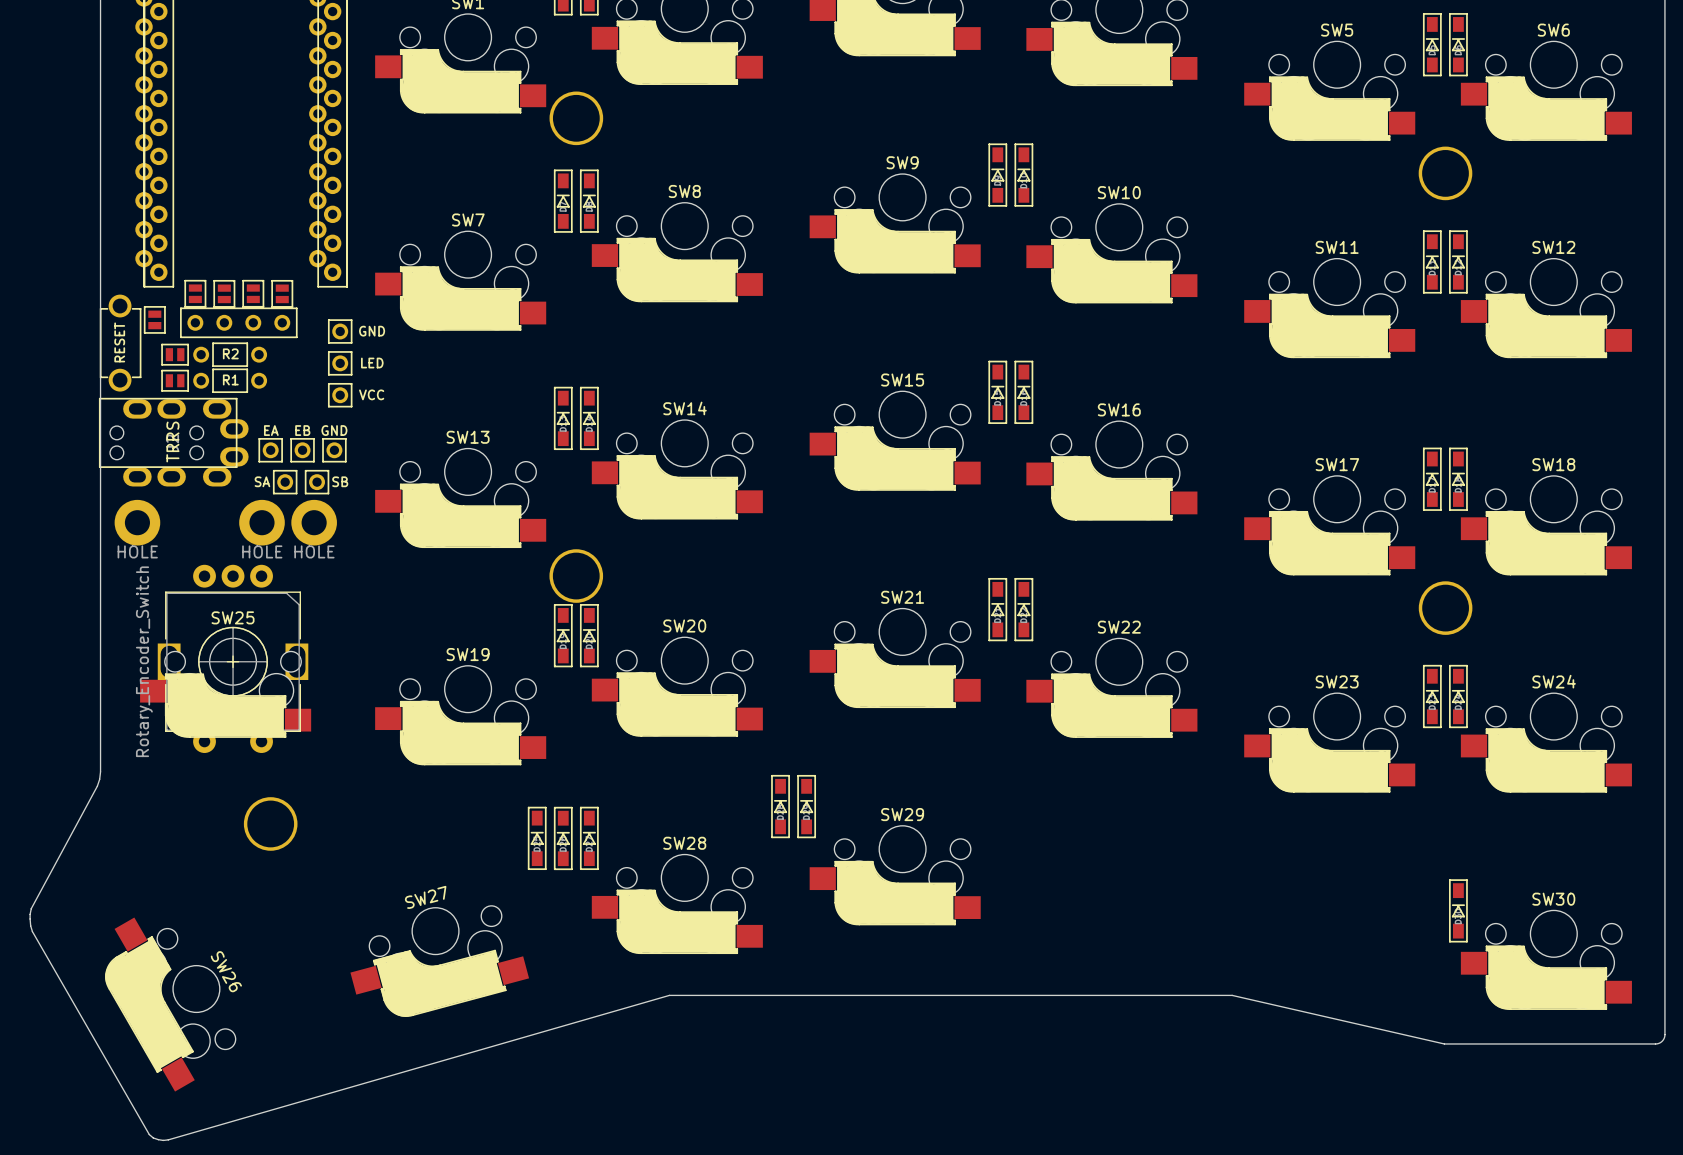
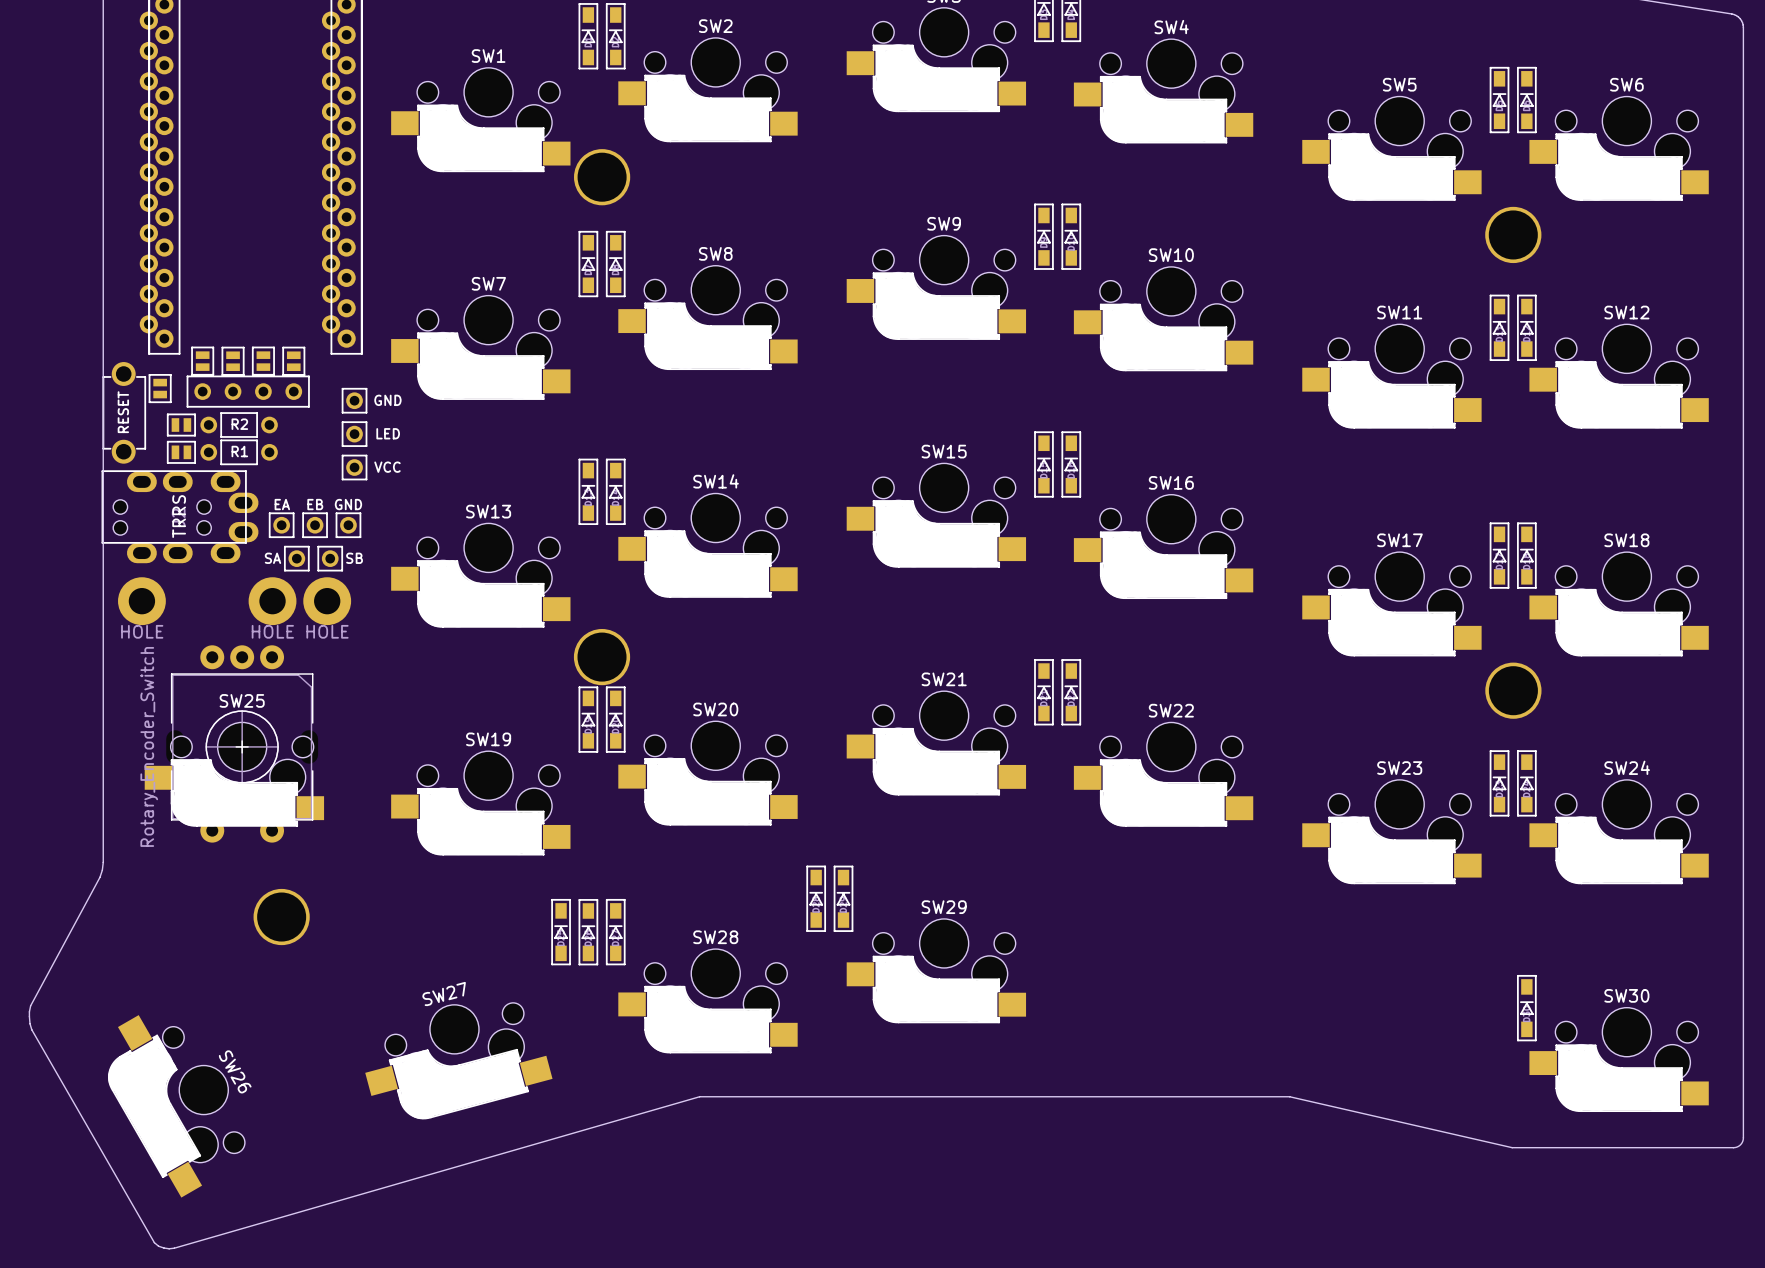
part footprint: [157, 564, 309, 753] -> [166, 645, 319, 843]

